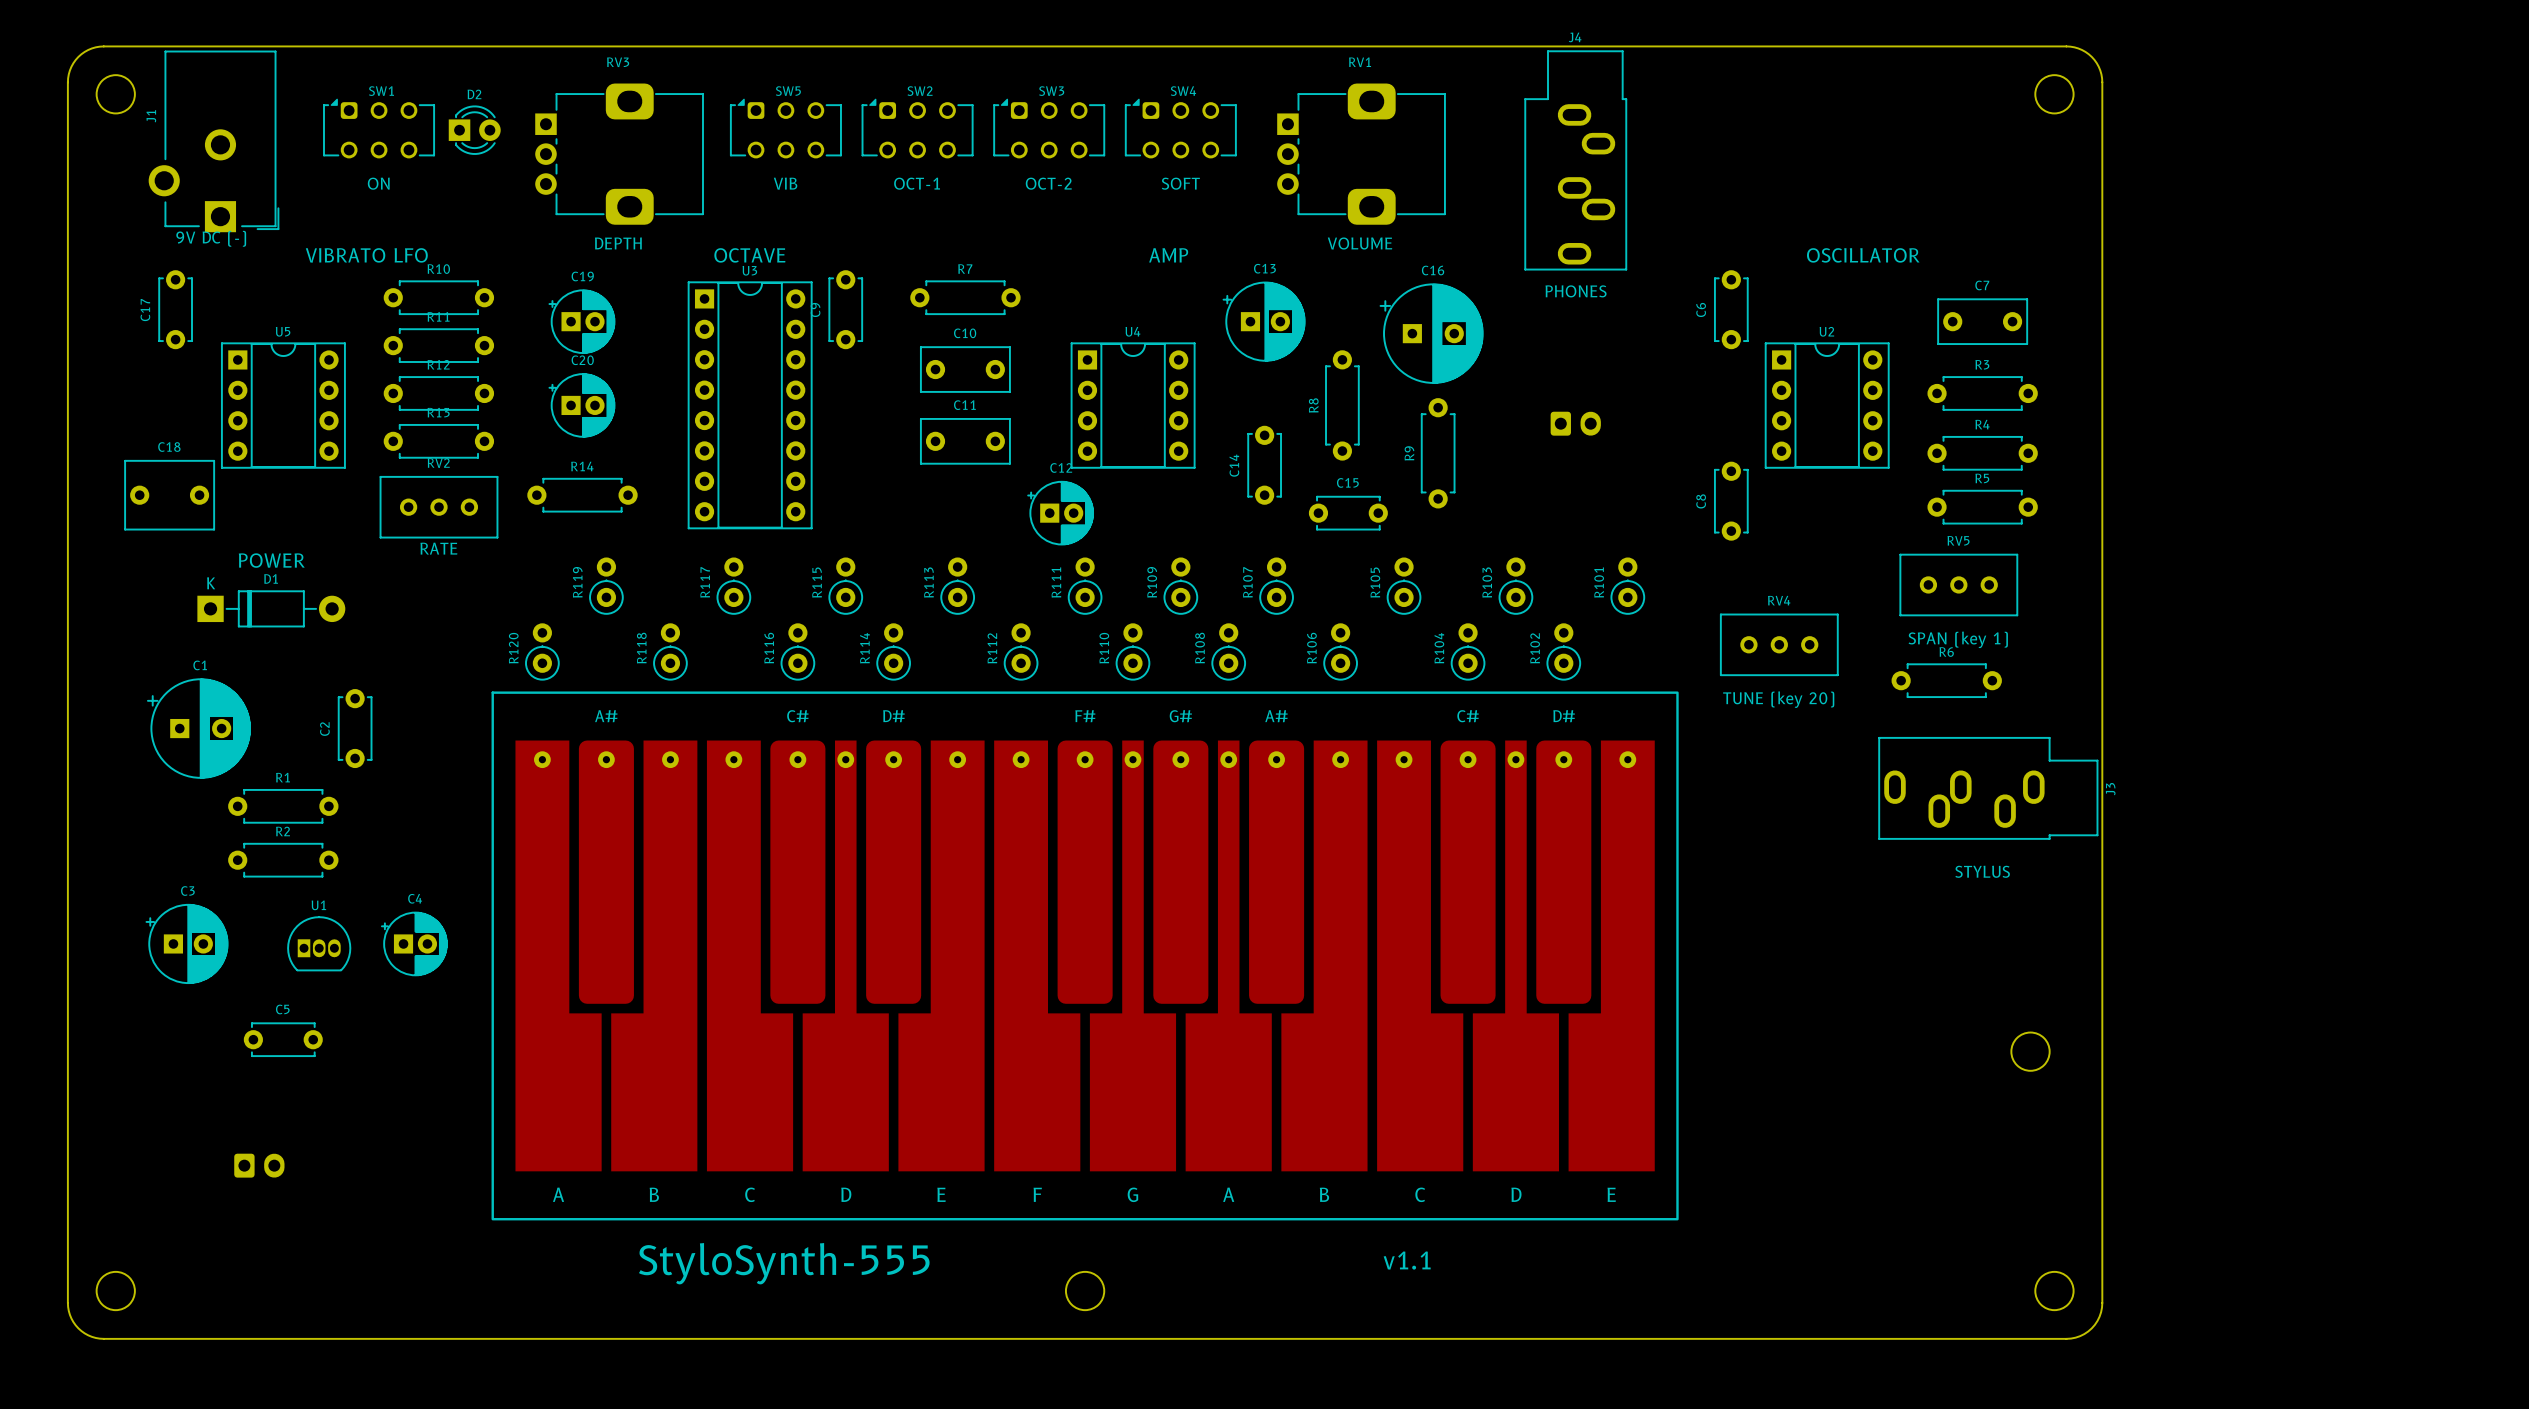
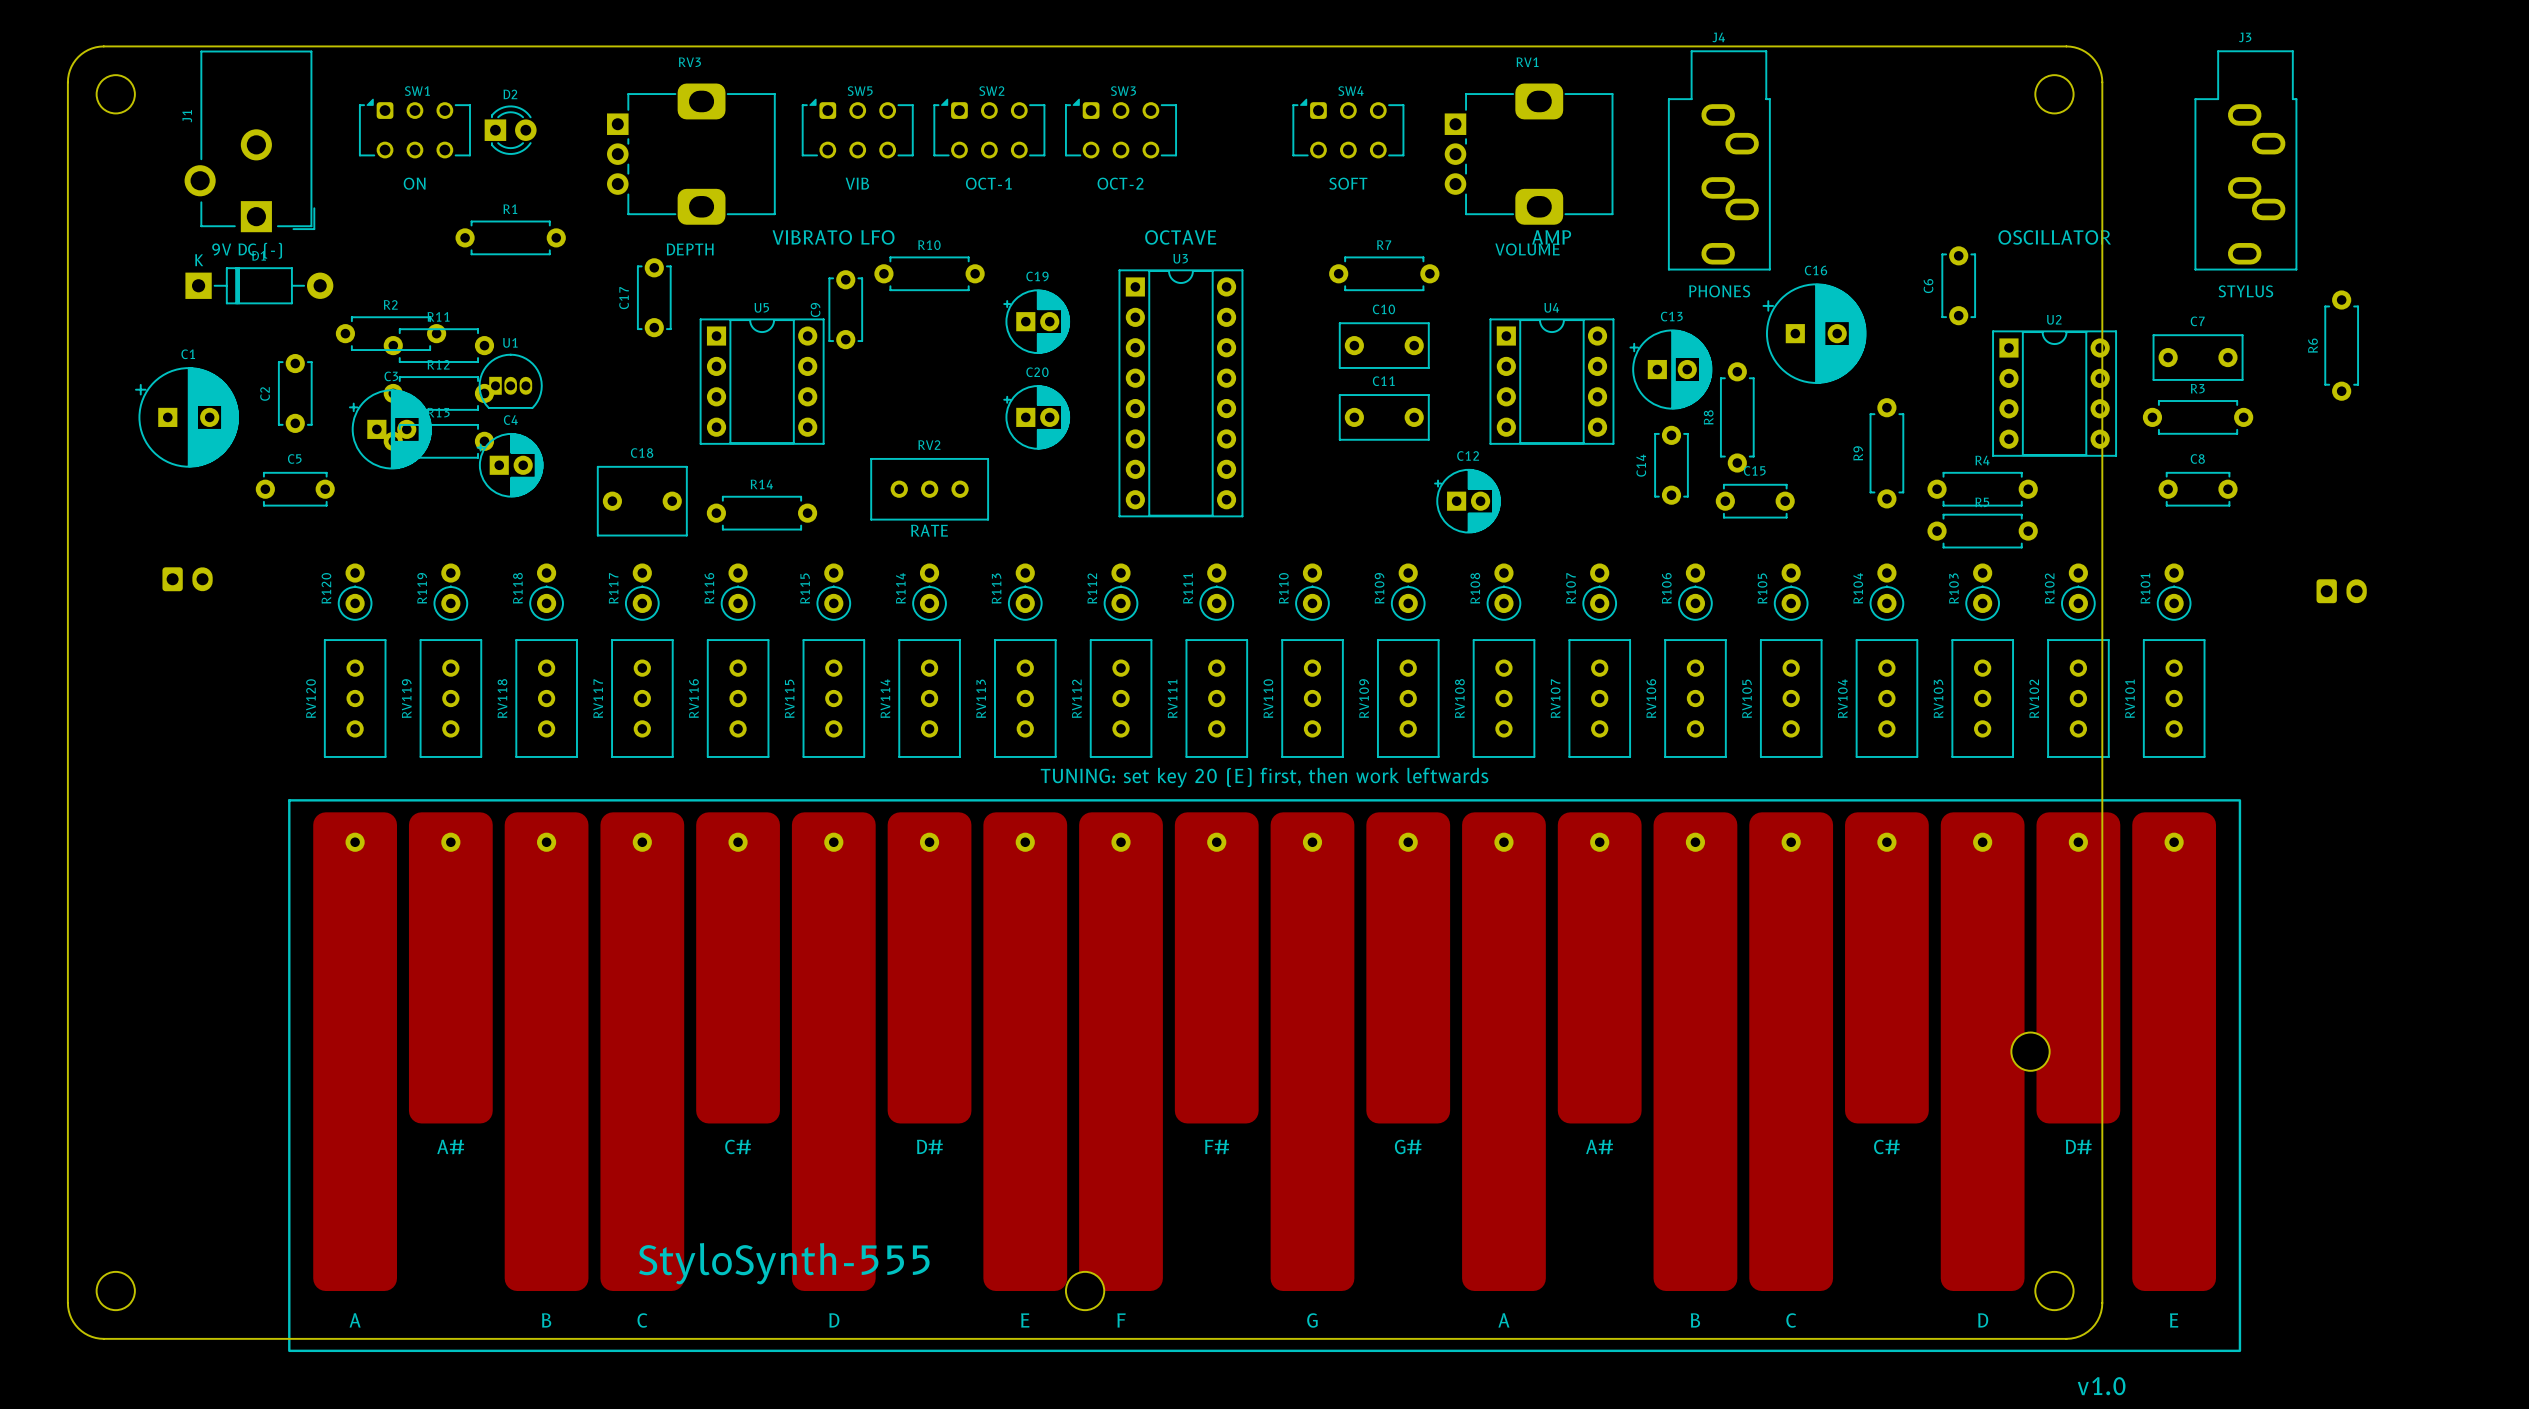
SW1 position: (379, 128) -> (414, 128)
SW5 position: (785, 128) -> (857, 128)
SW2 position: (917, 128) -> (989, 128)
SW3 position: (1049, 128) -> (1121, 128)
SW4 position: (1180, 128) -> (1348, 128)
D2 position: (474, 130) -> (510, 130)
J1 position: (213, 141) -> (249, 141)
RV3 position: (619, 154) -> (691, 154)
RV1 position: (1361, 154) -> (1528, 154)
J4 position: (1575, 160) -> (1719, 160)
text position: ON (378, 183) -> ON (414, 183)
text position: VIB (785, 183) -> VIB (857, 183)
text position: OCT-1 (917, 183) -> OCT-1 (988, 183)
text position: OCT-2 (1048, 183) -> OCT-2 (1120, 183)
text position: SOFT (1180, 183) -> SOFT (1348, 183)
text: none -> VIBRATO LFO (833, 237)
text: none -> OCTAVE (1180, 237)
text: none -> AMP (1551, 237)
text position: 9V DC (-) (211, 238) -> 9V DC (-) (247, 250)
text position: DEPTH (618, 243) -> DEPTH (690, 249)
text position: VOLUME (1360, 243) -> VOLUME (1527, 249)
text: VIBRATO LFO (366, 255) -> none
text: OCTAVE (749, 255) -> none
text: AMP (1168, 255) -> none
text position: OSCILLATOR (1863, 255) -> OSCILLATOR (2054, 237)
text position: PHONES (1576, 291) -> PHONES (1719, 291)
text: none -> STYLUS (2245, 291)
R10 position: (438, 297) -> (929, 273)
R7 position: (965, 297) -> (1384, 273)
C17 position: (175, 309) -> (654, 297)
C6 position: (1731, 309) -> (1958, 285)
C19 position: (581, 321) -> (1036, 321)
C13 position: (1264, 321) -> (1670, 369)
C7 position: (1982, 321) -> (2198, 357)
C16 position: (1431, 333) -> (1814, 333)
C10 position: (965, 369) -> (1384, 345)
R3 position: (1982, 393) -> (2198, 417)
U5 position: (283, 405) -> (762, 381)
C20 position: (581, 405) -> (1036, 417)
U3 position: (750, 405) -> (1180, 393)
U4 position: (1133, 405) -> (1551, 381)
R8 position: (1342, 405) -> (1737, 417)
U2 position: (1827, 405) -> (2054, 393)
part: (1575, 423) -> none
C11 position: (965, 441) -> (1384, 417)
R9 position: (1438, 453) -> (1886, 453)
R4 position: (1982, 453) -> (1982, 489)
C14 position: (1264, 465) -> (1671, 465)
C18 position: (169, 495) -> (642, 501)
R14 position: (582, 495) -> (761, 513)
C8 rotation: 0° (1731, 501) -> 90° clockwise (2198, 489)
C8 position: (1731, 501) -> (2198, 489)
RV2 position: (439, 507) -> (929, 489)
R5 position: (1982, 507) -> (1982, 531)
C12 position: (1060, 513) -> (1467, 501)
C15 position: (1348, 513) -> (1755, 501)
text: none -> RATE (929, 530)
text: RATE (438, 548) -> none
text: POWER (271, 560) -> none
part: none -> (187, 579)
RV5: (1958, 585) -> none
R119 position: (606, 586) -> (450, 592)
R117 position: (733, 586) -> (642, 592)
R115 position: (845, 586) -> (833, 592)
R113 position: (957, 586) -> (1025, 592)
R111 position: (1085, 586) -> (1216, 592)
R109 position: (1180, 586) -> (1408, 592)
R107 position: (1276, 586) -> (1599, 592)
R105 position: (1404, 586) -> (1791, 592)
R103 position: (1515, 586) -> (1982, 592)
R101 position: (1627, 586) -> (2174, 592)
part: none -> (2341, 591)
D1 position: (271, 608) -> (259, 285)
text: SPAN (key 1) (1958, 639) -> none
RV4: (1779, 644) -> none
R120 position: (542, 651) -> (355, 592)
R118 position: (670, 651) -> (546, 592)
R116 position: (797, 651) -> (738, 592)
R114 position: (893, 651) -> (929, 592)
R112 position: (1021, 651) -> (1121, 592)
R110 position: (1132, 651) -> (1312, 592)
R108 position: (1228, 651) -> (1503, 592)
R106 position: (1340, 651) -> (1695, 592)
R104 position: (1468, 651) -> (1886, 592)
R102 position: (1563, 651) -> (2078, 592)
R6 name position: R6 (1946, 652) -> R6 (2313, 345)
R6 rotation: 0° (1946, 680) -> 90° clockwise (2341, 345)
R6 position: (1946, 680) -> (2341, 345)
RV120: none -> (355, 698)
RV119: none -> (450, 698)
RV118: none -> (546, 698)
RV117: none -> (642, 698)
RV116: none -> (738, 698)
RV115: none -> (833, 698)
RV114: none -> (929, 698)
RV113: none -> (1025, 698)
RV112: none -> (1121, 698)
RV111: none -> (1216, 698)
RV110: none -> (1312, 698)
RV109: none -> (1408, 698)
RV108: none -> (1504, 698)
RV107: none -> (1599, 698)
RV106: none -> (1695, 698)
RV105: none -> (1791, 698)
RV104: none -> (1886, 698)
RV103: none -> (1982, 698)
RV102: none -> (2078, 698)
RV101: none -> (2174, 698)
text: TUNE (key 20) (1778, 699) -> none
C1 position: (198, 728) -> (187, 417)
C2 position: (355, 728) -> (295, 393)
text: none -> TUNING: set key 20 (E) first, then work leftwards (1264, 777)
J3 rotation: 0° (1988, 788) -> 90° counterclockwise (2245, 160)
J3 position: (1988, 788) -> (2245, 160)
R1 position: (283, 806) -> (510, 237)
R2 position: (283, 860) -> (391, 333)
text: STYLUS (1982, 871) -> none
C3 position: (187, 943) -> (390, 429)
U1 position: (319, 943) -> (510, 381)
C4 position: (414, 943) -> (510, 465)
part: (1085, 955) -> none
C5 position: (283, 1039) -> (295, 489)
part: none -> (1264, 1075)
part: (259, 1165) -> none
text: v1.1 (1407, 1260) -> none
text: none -> v1.0 (2101, 1386)

